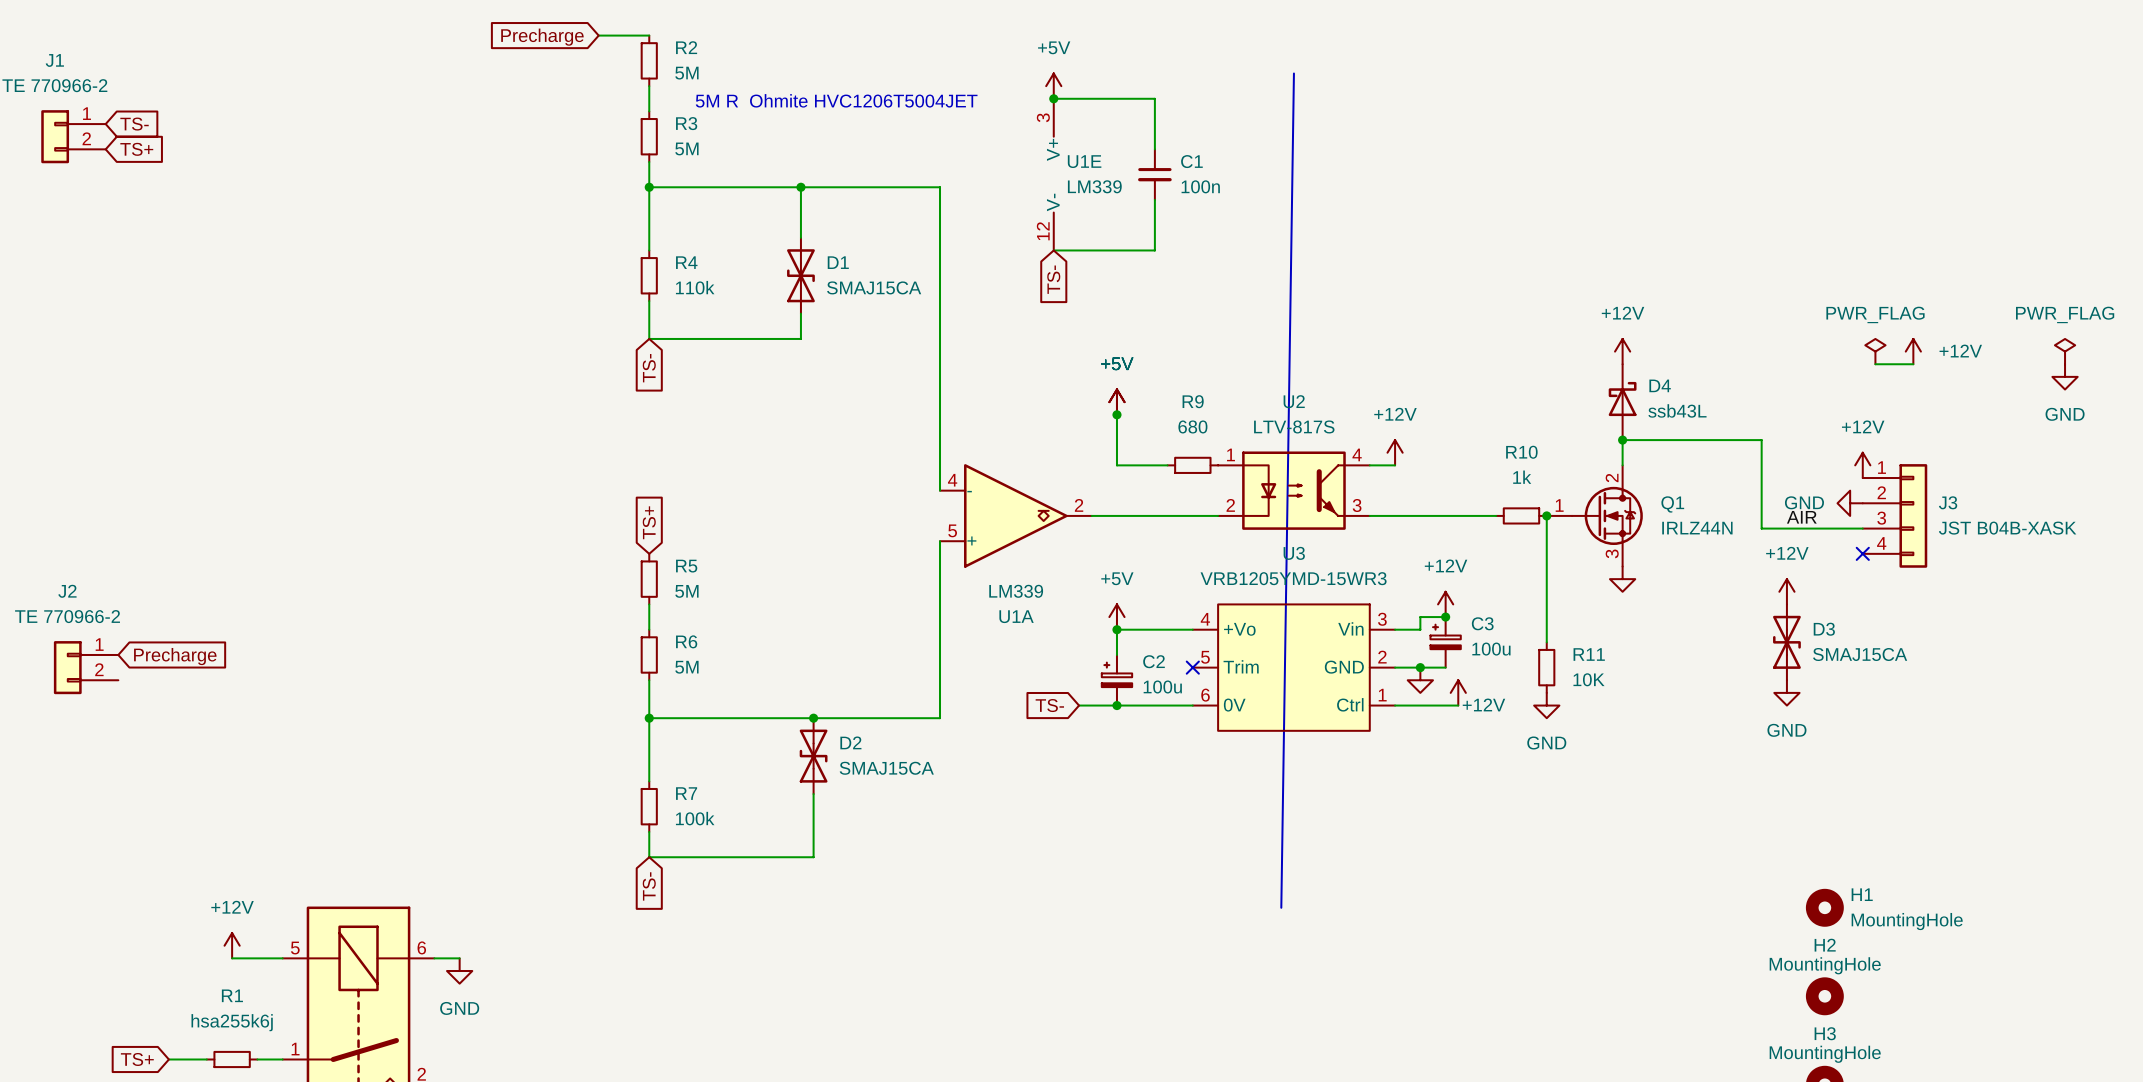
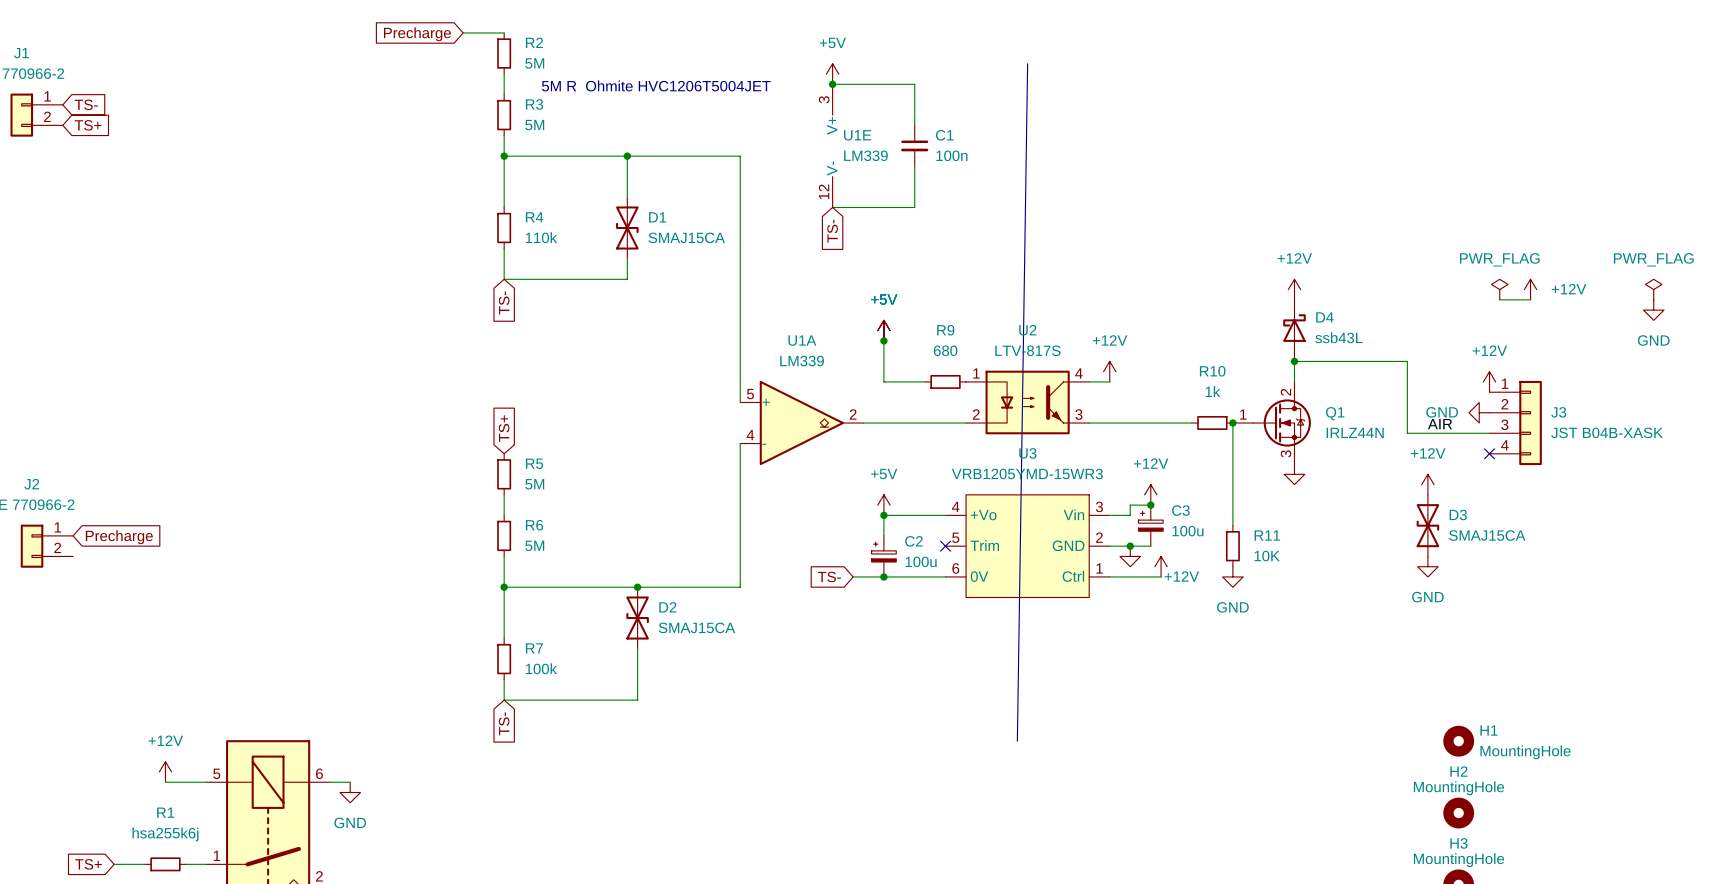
U1A flip: as is (1015, 515) -> up-down (801, 423)

